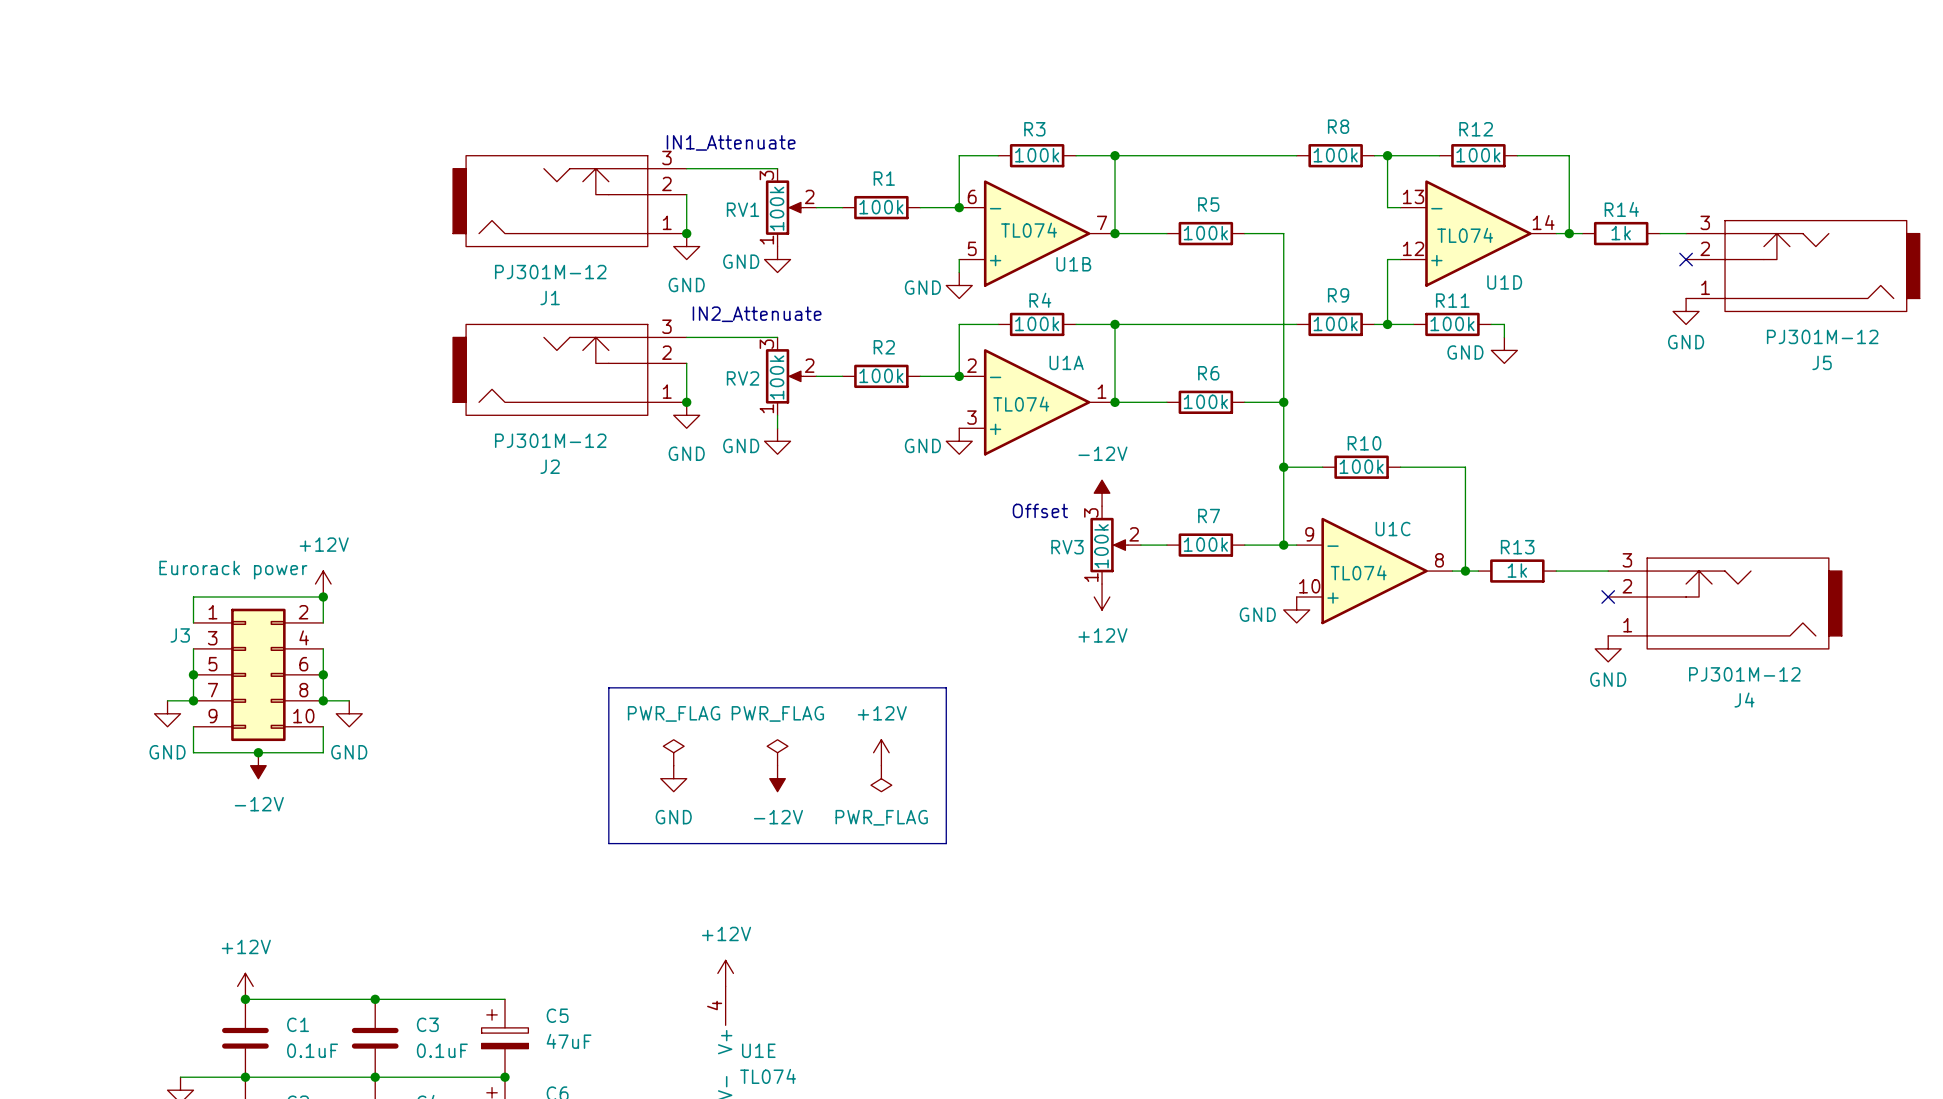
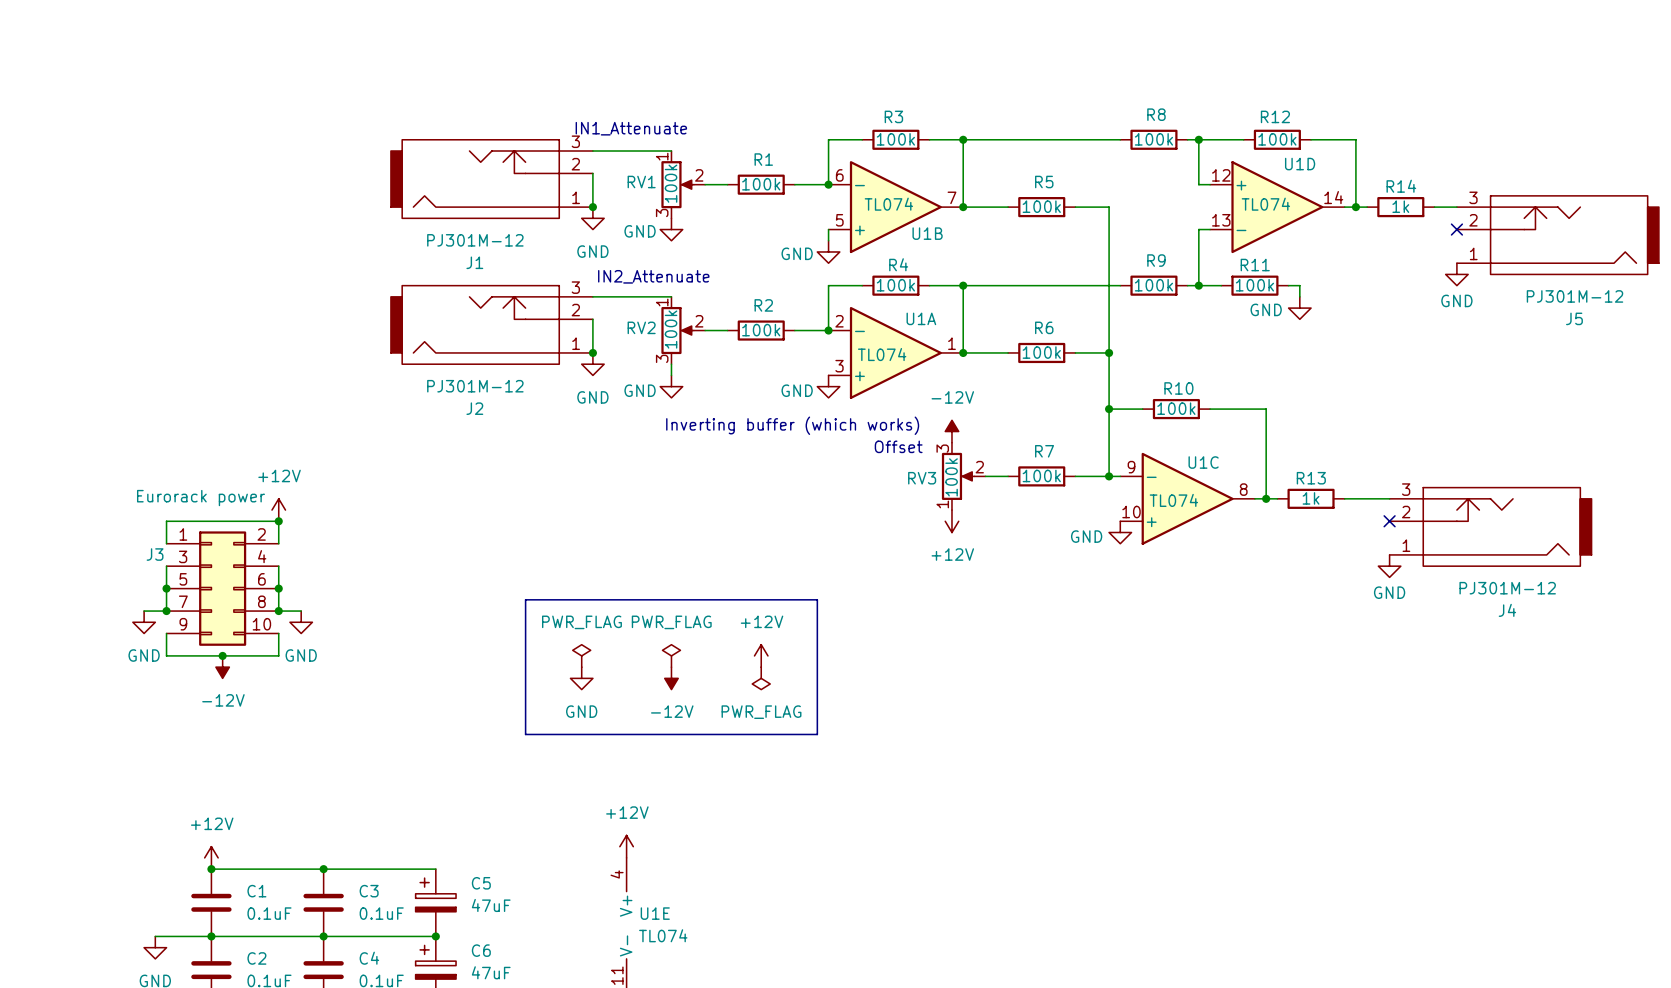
RV1 flip: as is (784, 207) -> up-down (677, 184)
U1D flip: as is (1478, 233) -> up-down (1277, 207)
RV2 flip: as is (784, 376) -> up-down (677, 330)
text: none -> Inverting buffer (which works) (792, 425)

